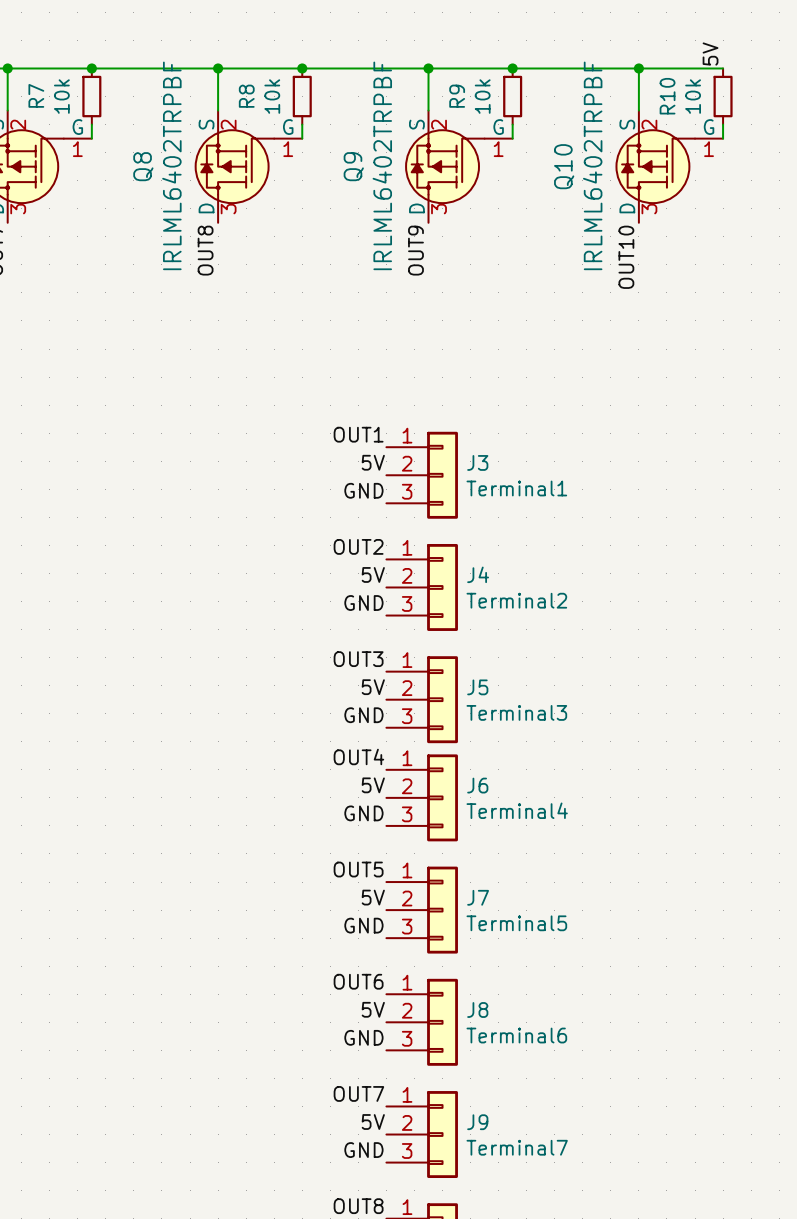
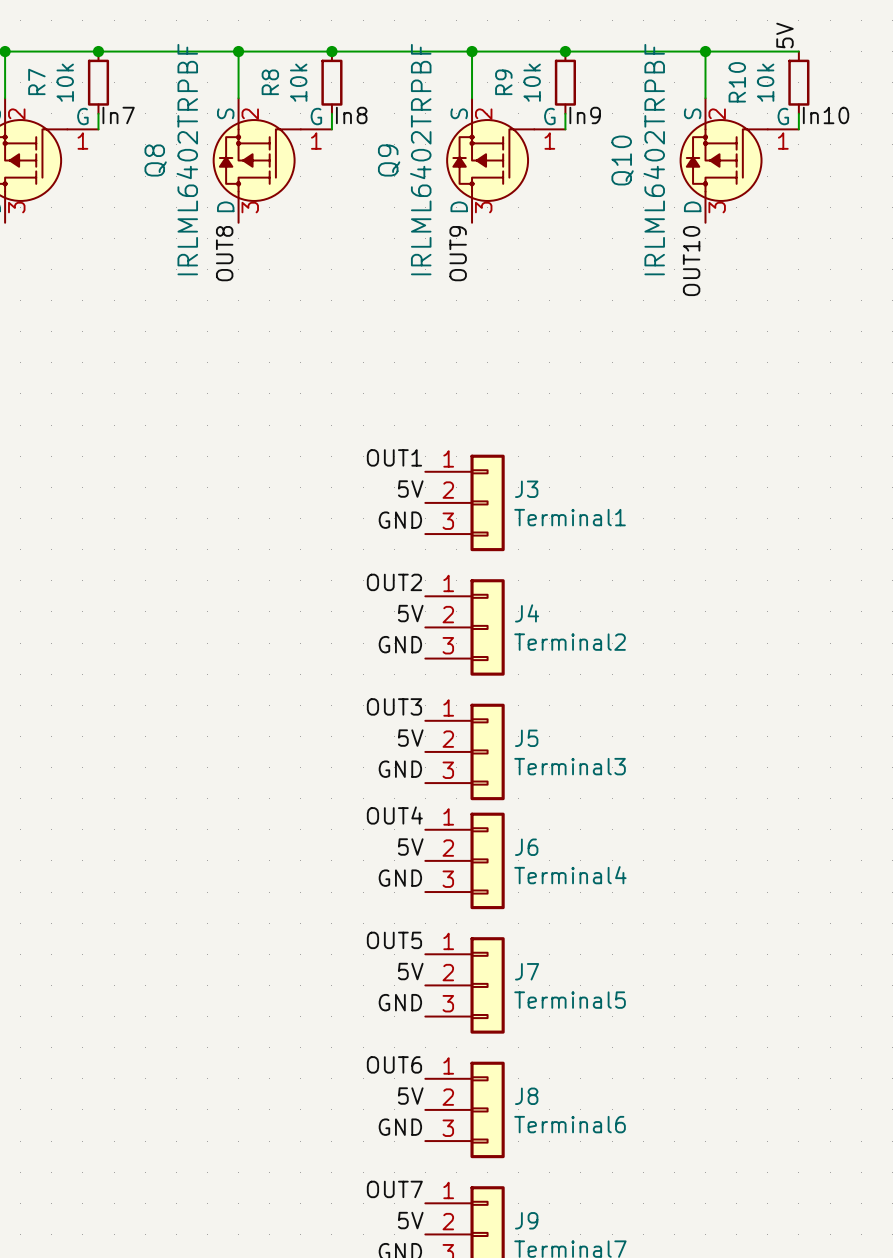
label: none -> In7 (118, 115)
label: none -> In8 (351, 115)
label: none -> In9 (585, 115)
label: none -> In10 (826, 115)

